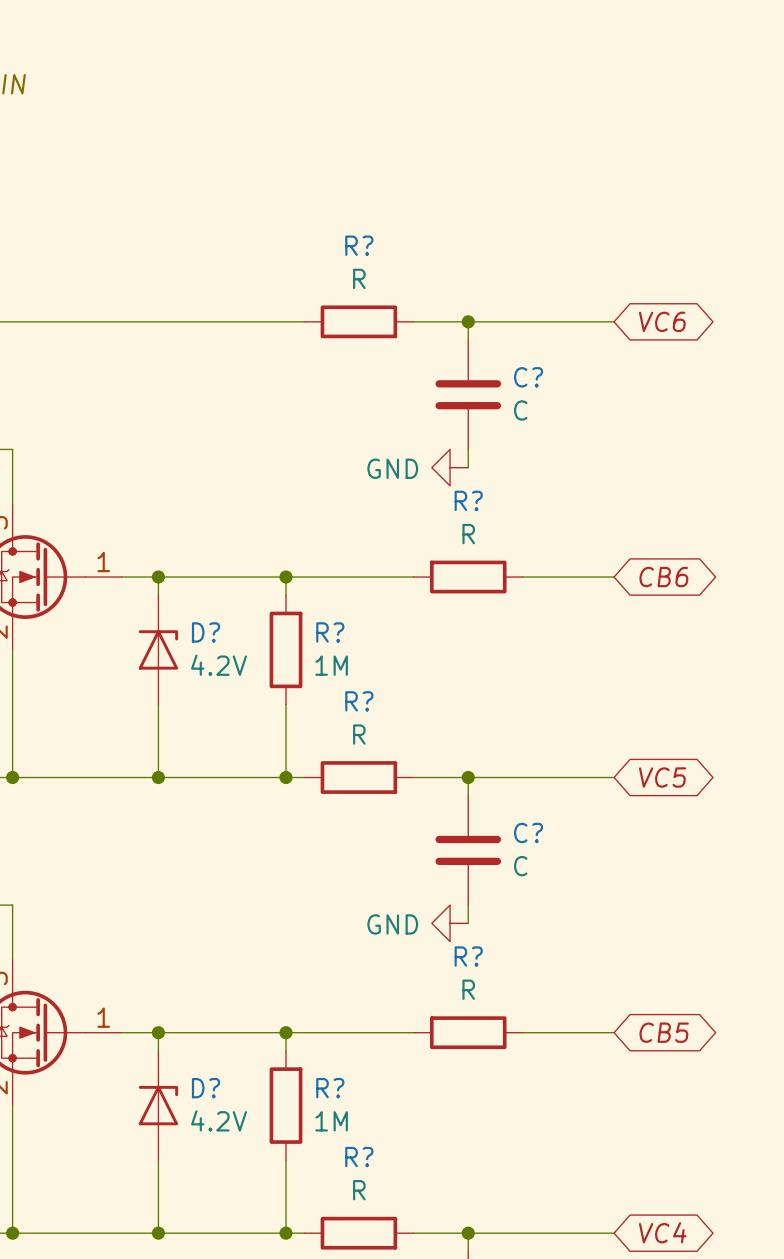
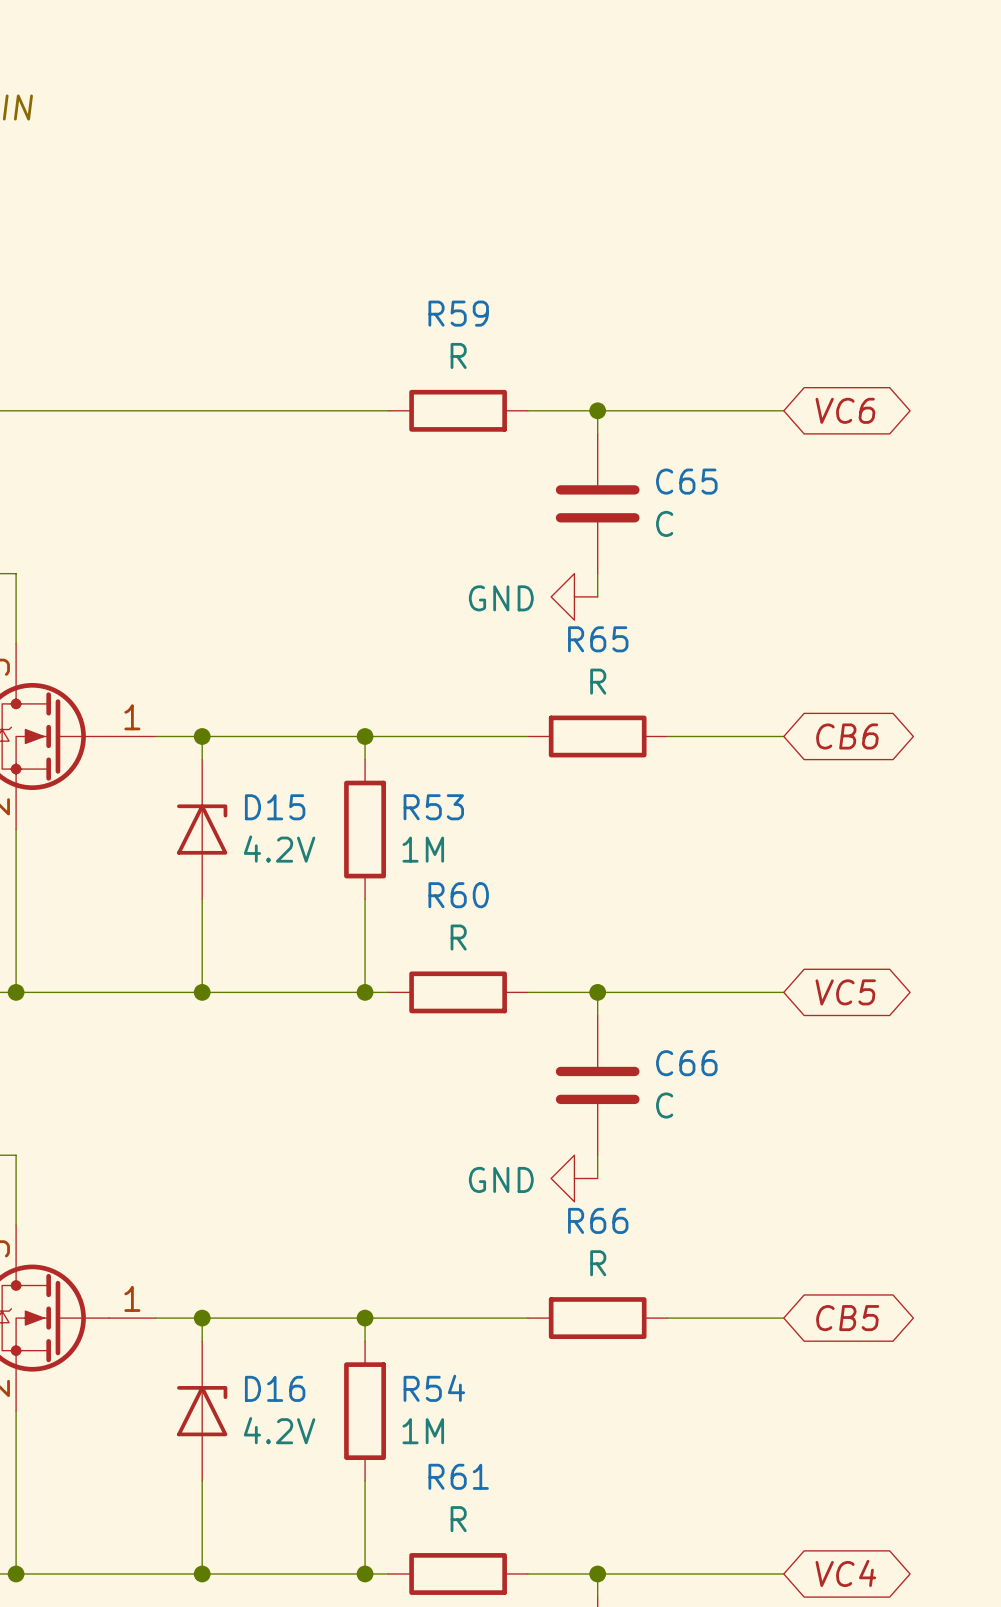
R? name: R? (359, 245) -> R59 (458, 313)
C? name: C? (528, 377) -> C65 (686, 481)
R? name: R? (468, 500) -> R65 (598, 639)
D? name: D? (206, 632) -> D15 (275, 807)
R? name: R? (330, 632) -> R53 (433, 807)
R? name: R? (359, 701) -> R60 (458, 895)
C? name: C? (528, 832) -> C66 (686, 1063)
R? name: R? (468, 956) -> R66 (598, 1220)
D? name: D? (206, 1088) -> D16 (275, 1388)
R? name: R? (330, 1088) -> R54 (434, 1388)
R? name: R? (359, 1157) -> R61 (458, 1476)

